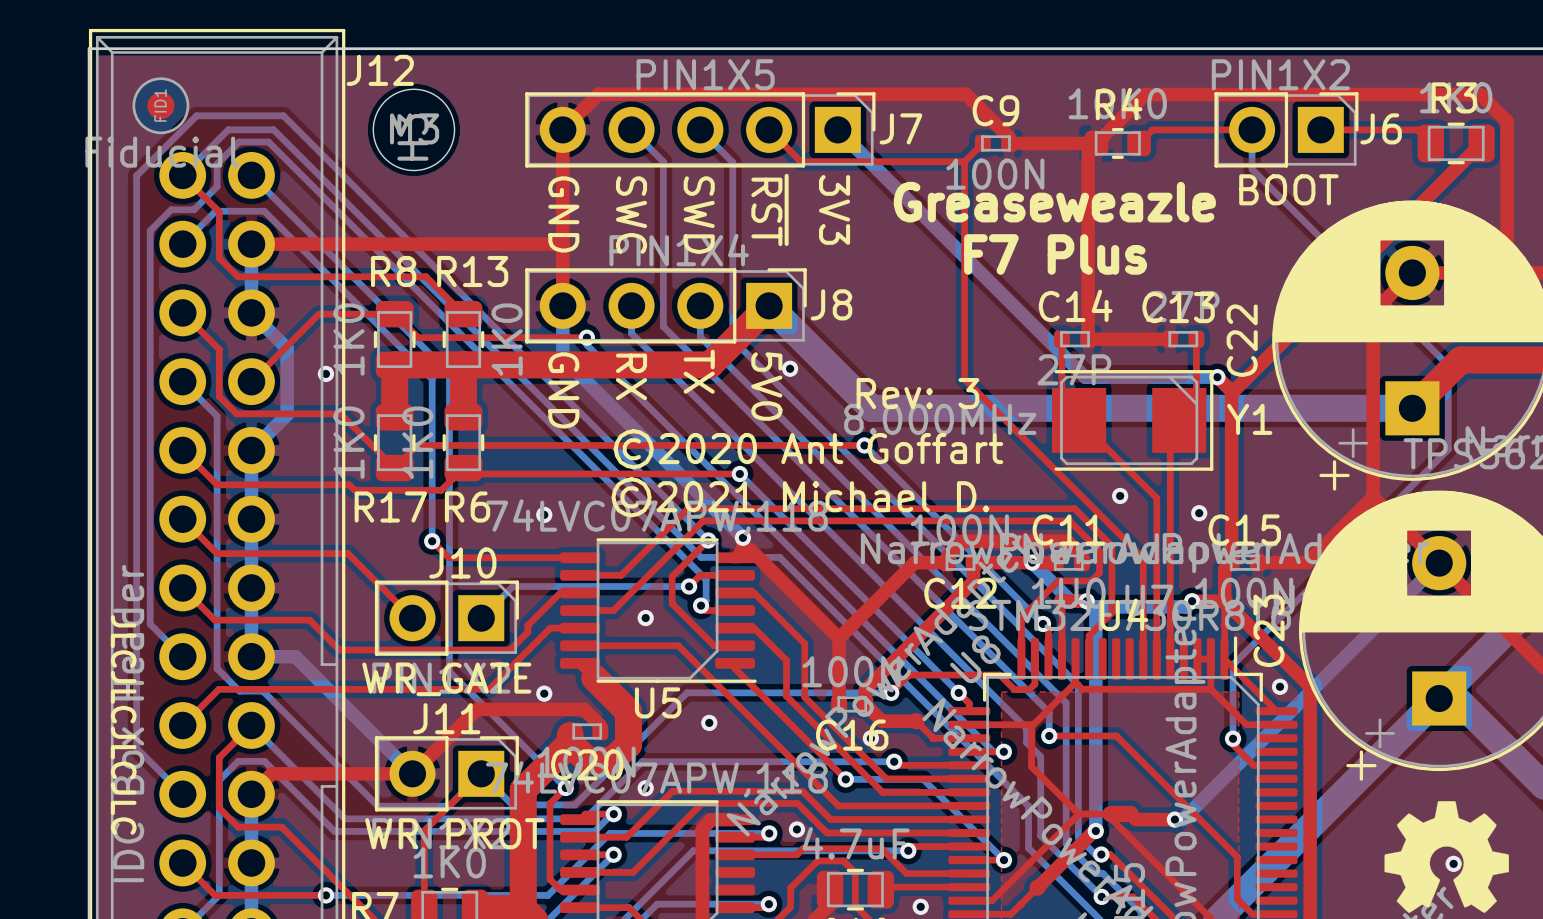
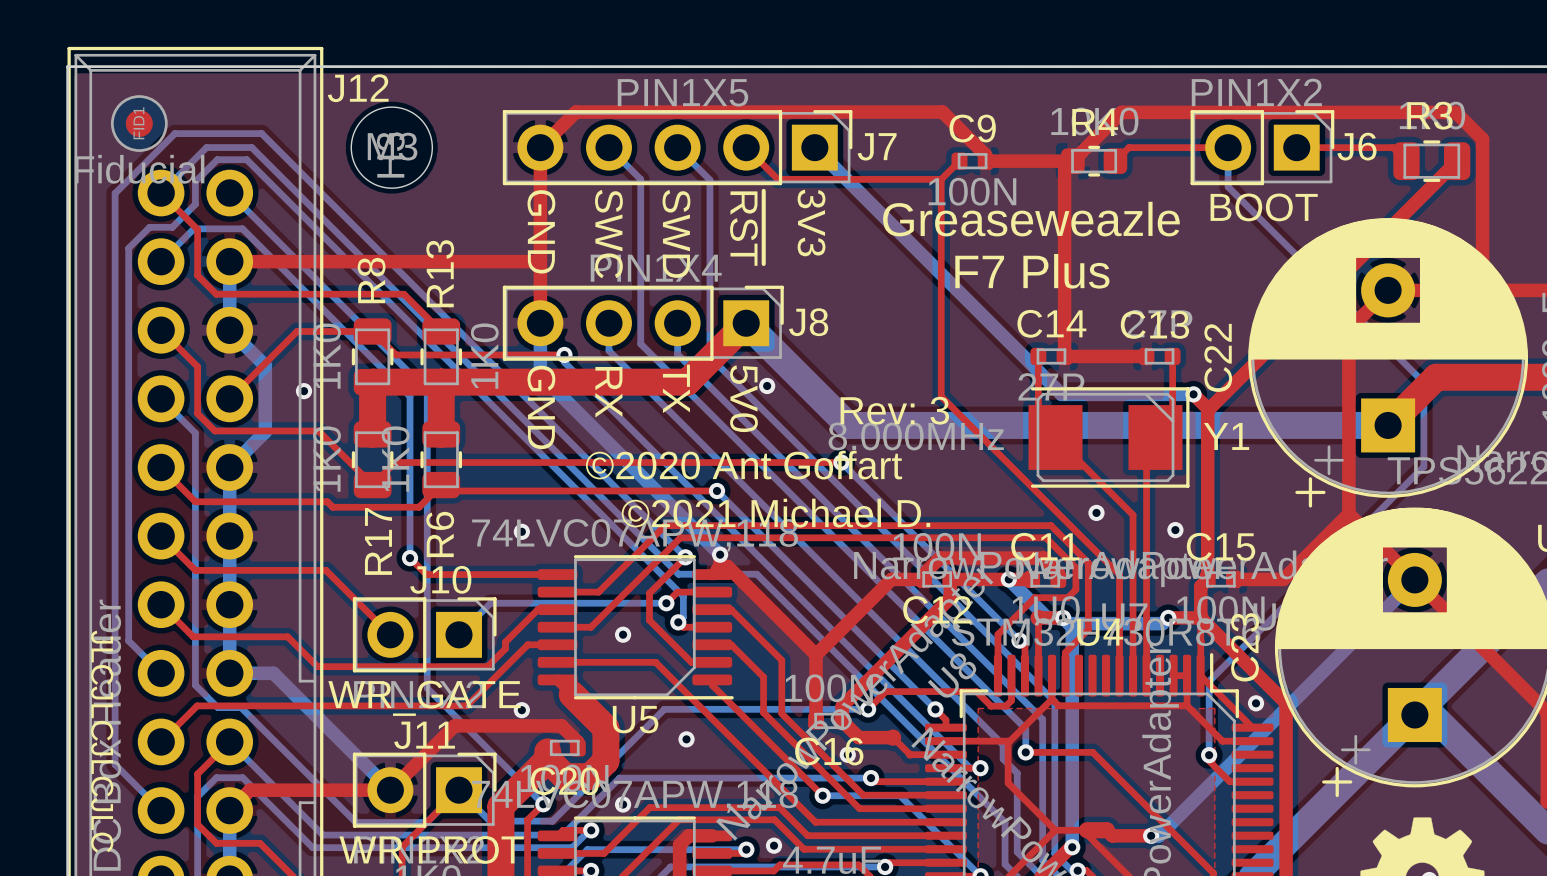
R8 name rotation: 0° (393, 271) -> 90° counterclockwise (371, 280)
R13 name rotation: 0° (472, 271) -> 90° counterclockwise (440, 273)
R17 name rotation: 0° (390, 507) -> 90° counterclockwise (378, 541)
R6 name rotation: 0° (467, 507) -> 90° counterclockwise (440, 534)

